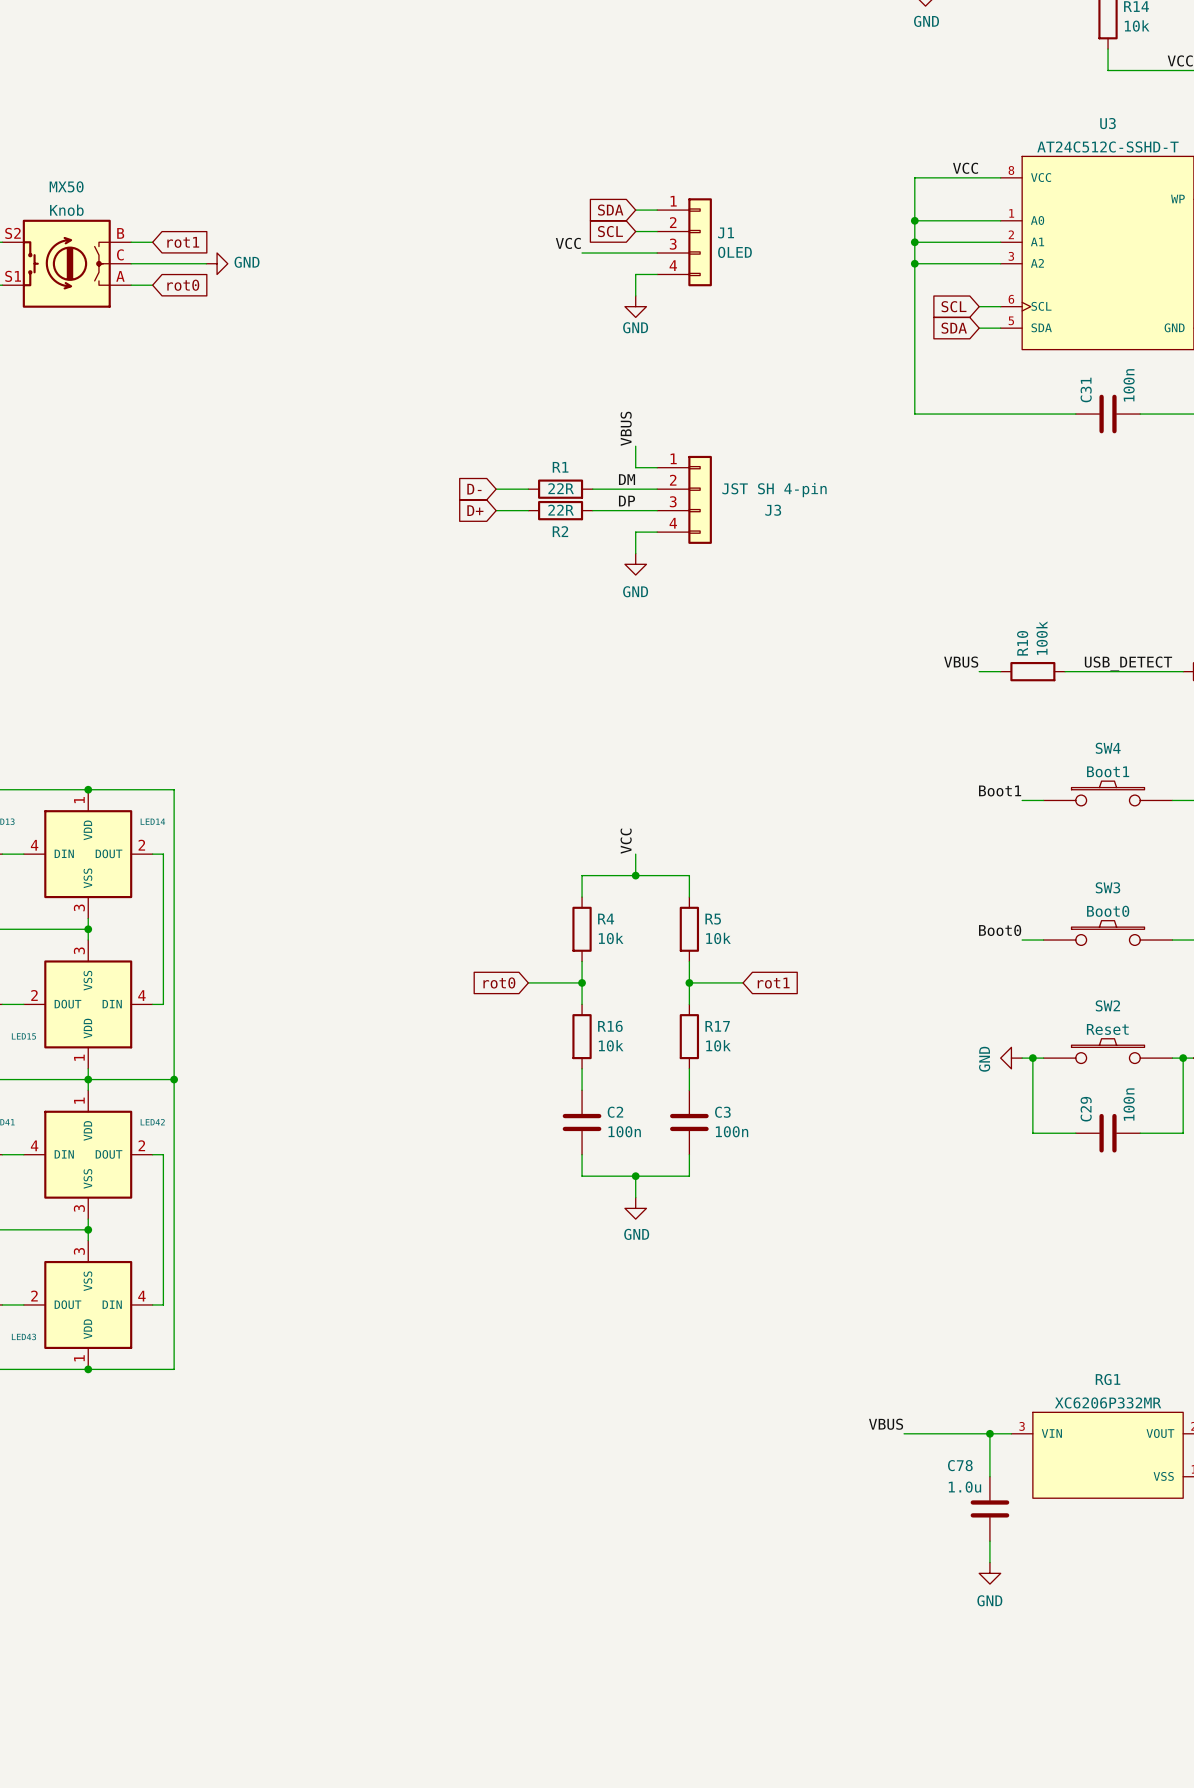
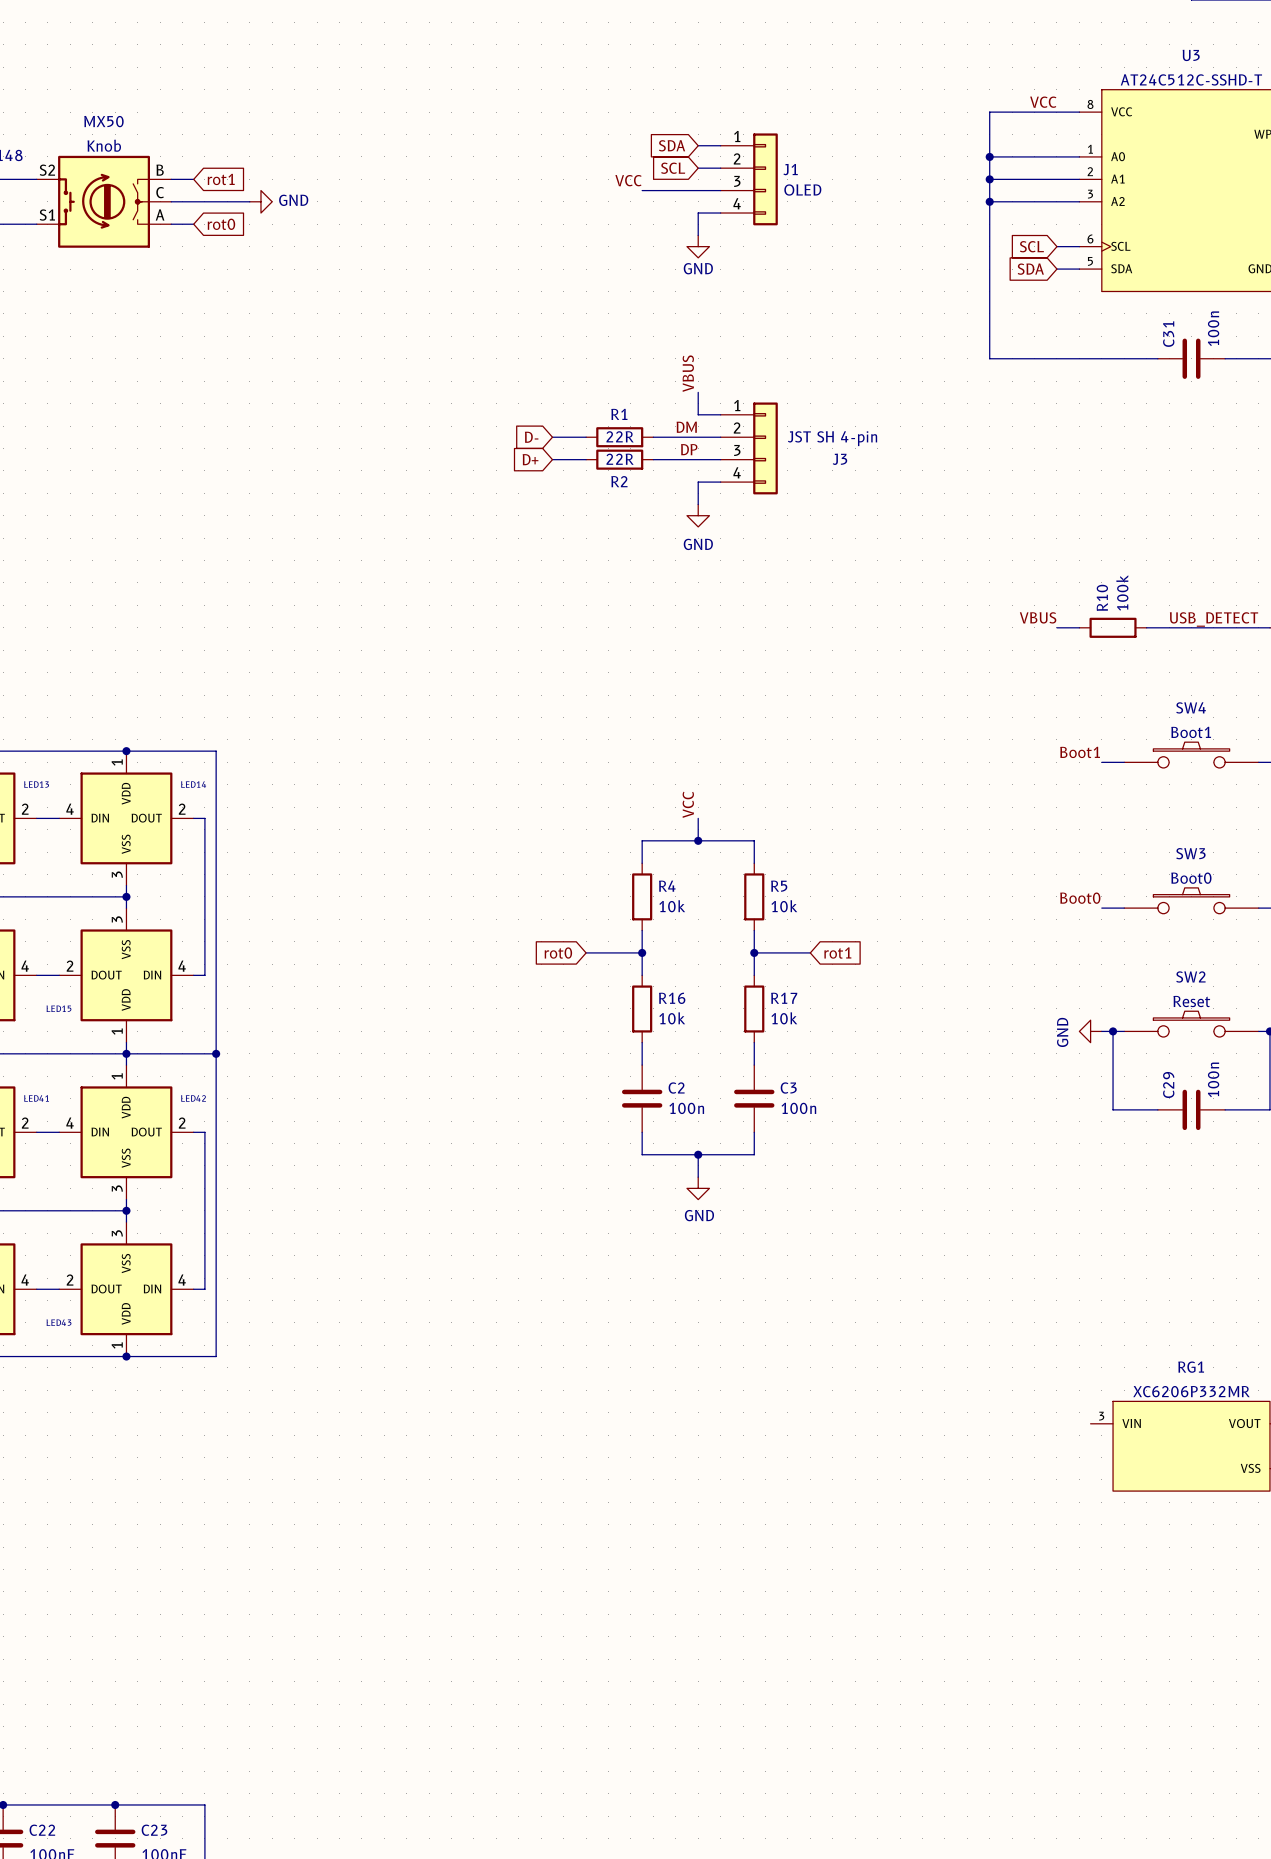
label: VBUS (886, 1424) -> none
wire: (904, 1433) (1011, 1433) -> none
wire: (989, 1433) (989, 1476) -> none
junction: (989, 1433) -> none
C78: 1.0u (989, 1508) -> none
wire: (989, 1541) (989, 1562) -> none
power symbol: GND (989, 1573) -> none

